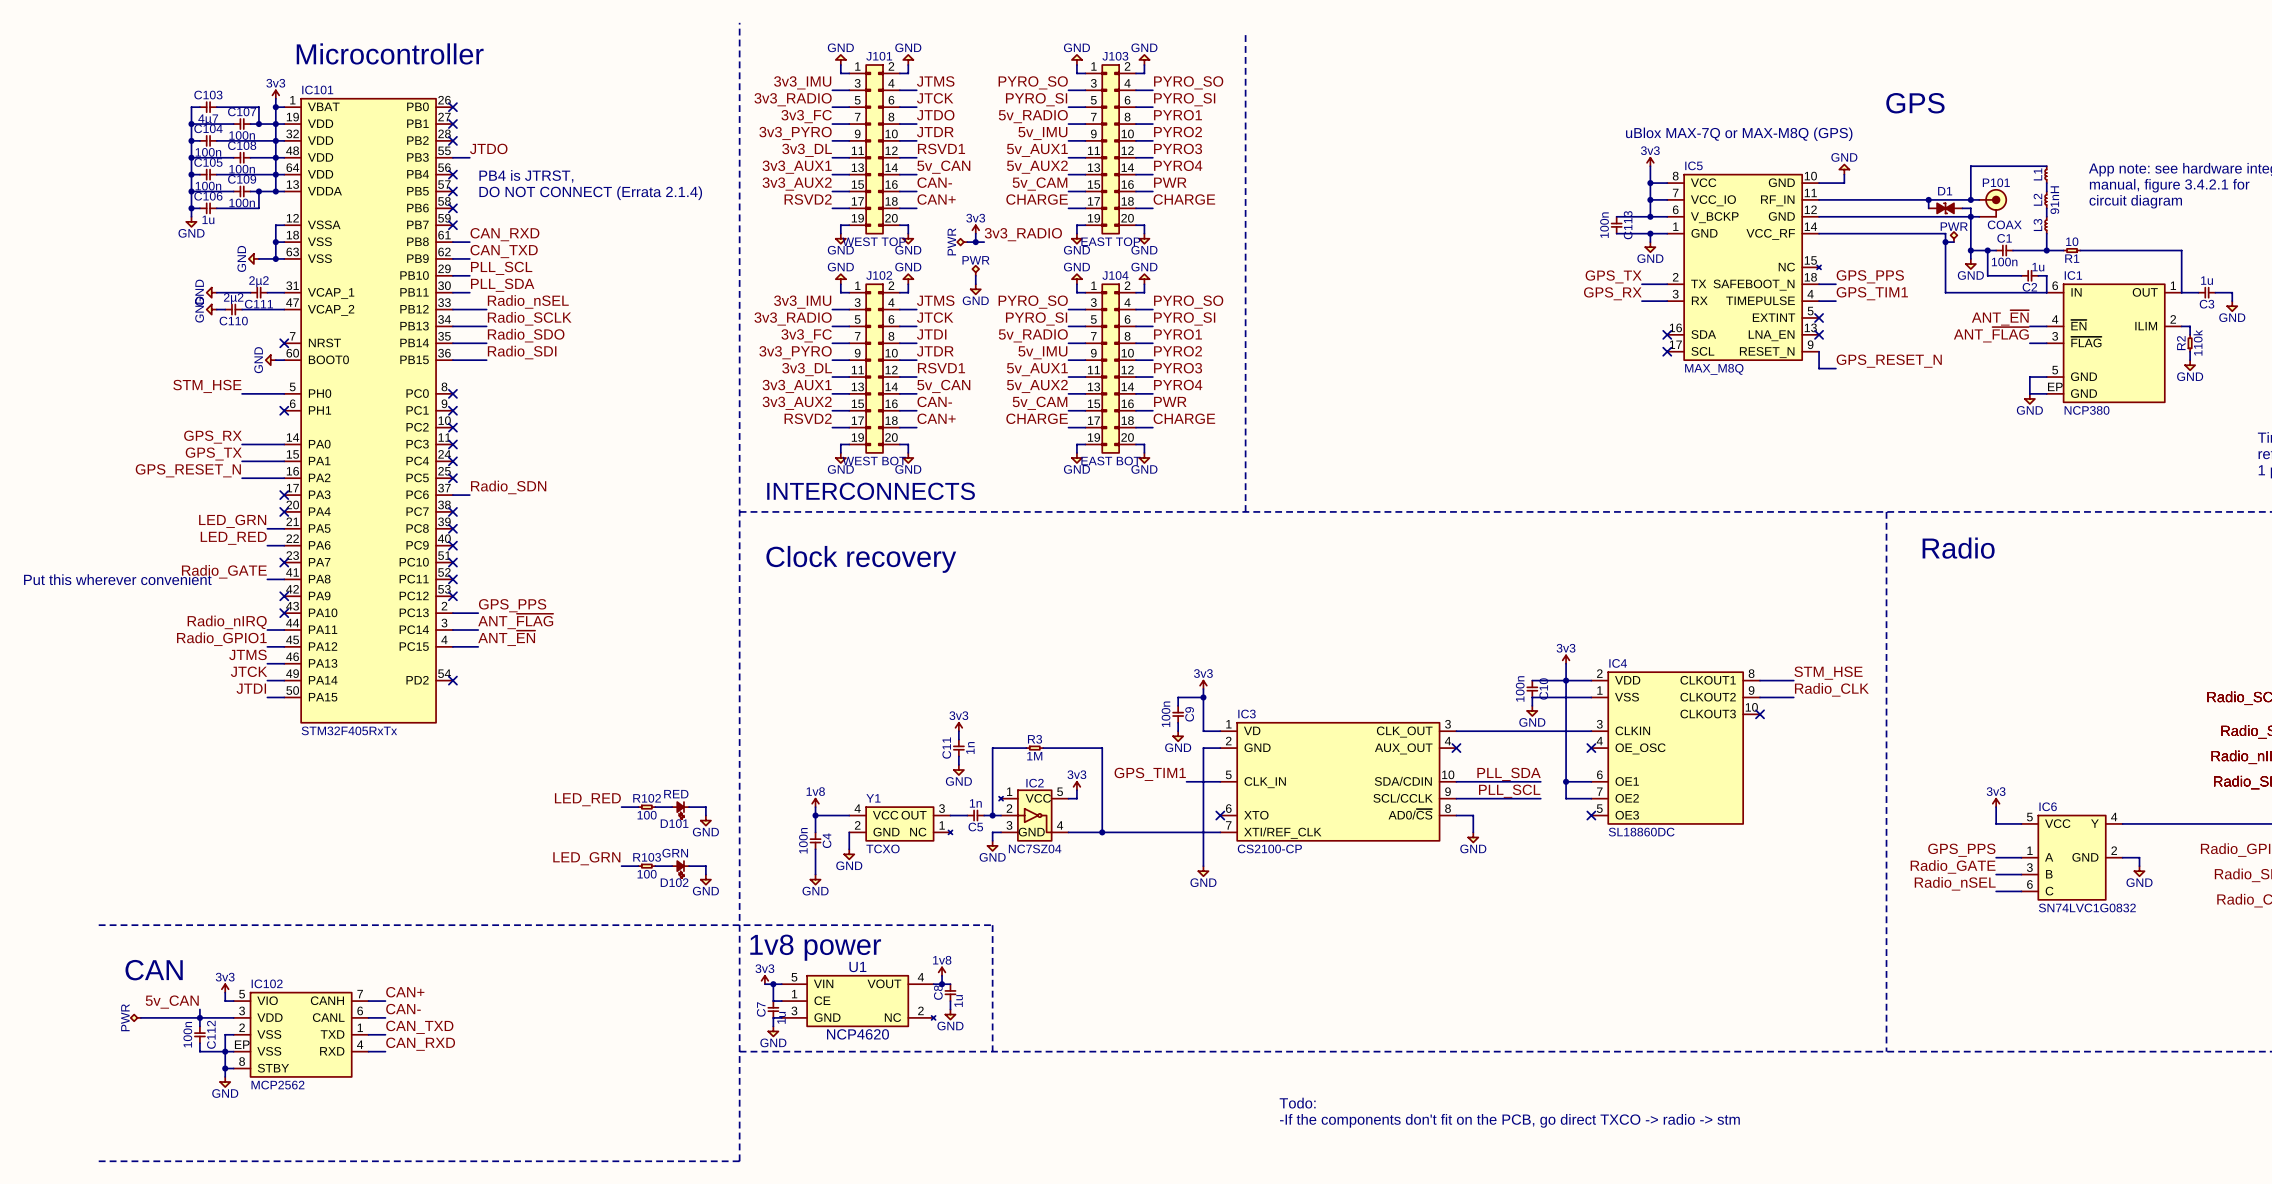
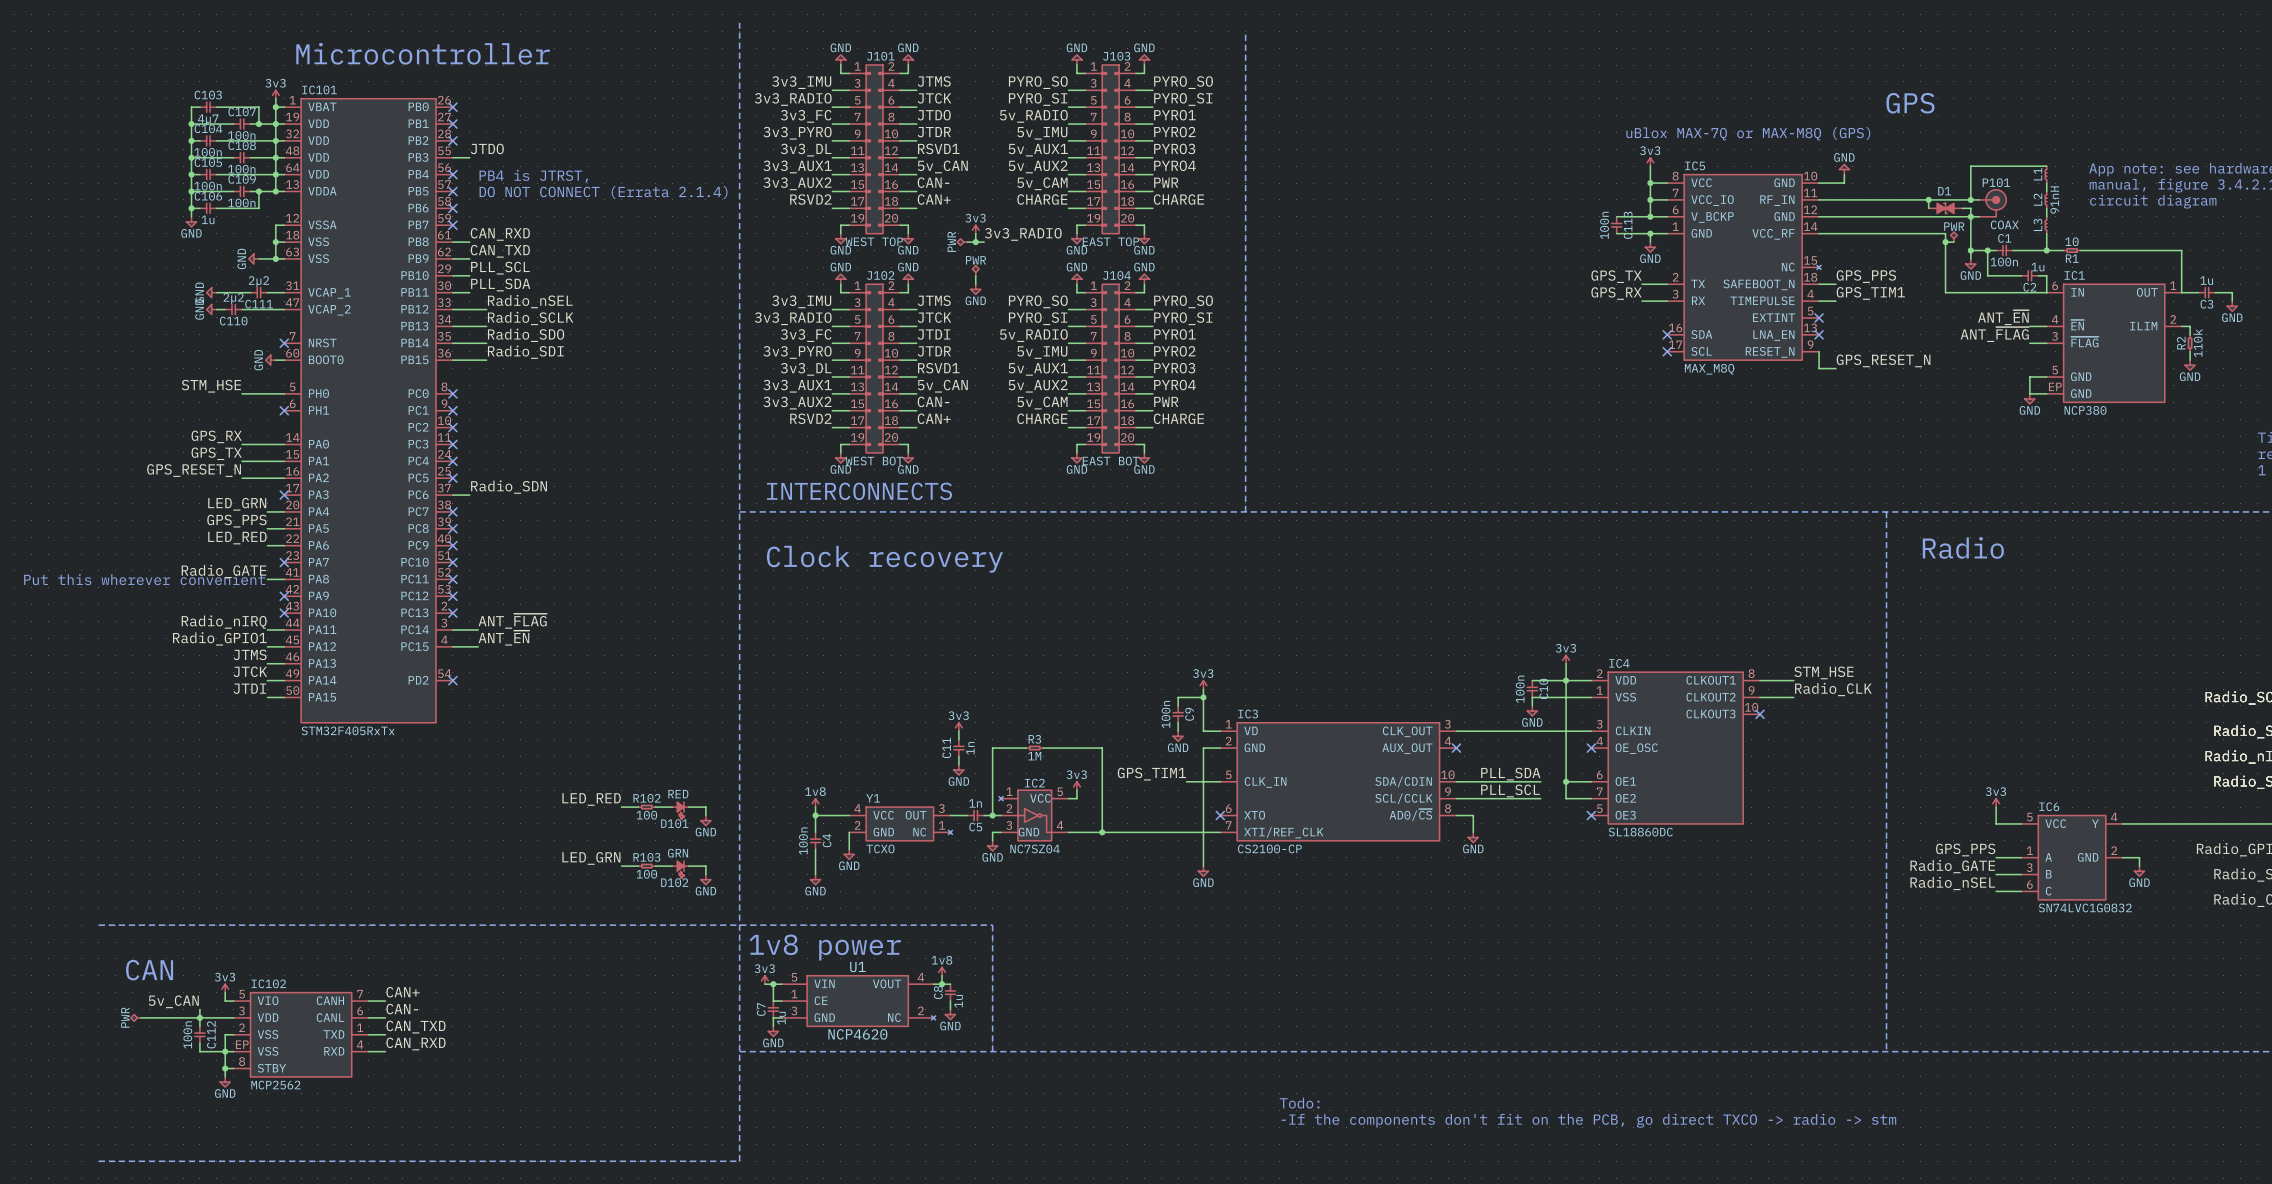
label: none -> LED_GRN (237, 504)
wire: none -> (267, 511) (284, 511)
no-connect mark: (284, 511) -> none
label: LED_GRN (232, 521) -> GPS_PPS (236, 521)
label: GPS_PPS (512, 605) -> none
wire: (452, 613) (478, 613) -> none
no-connect mark: none -> (452, 613)

